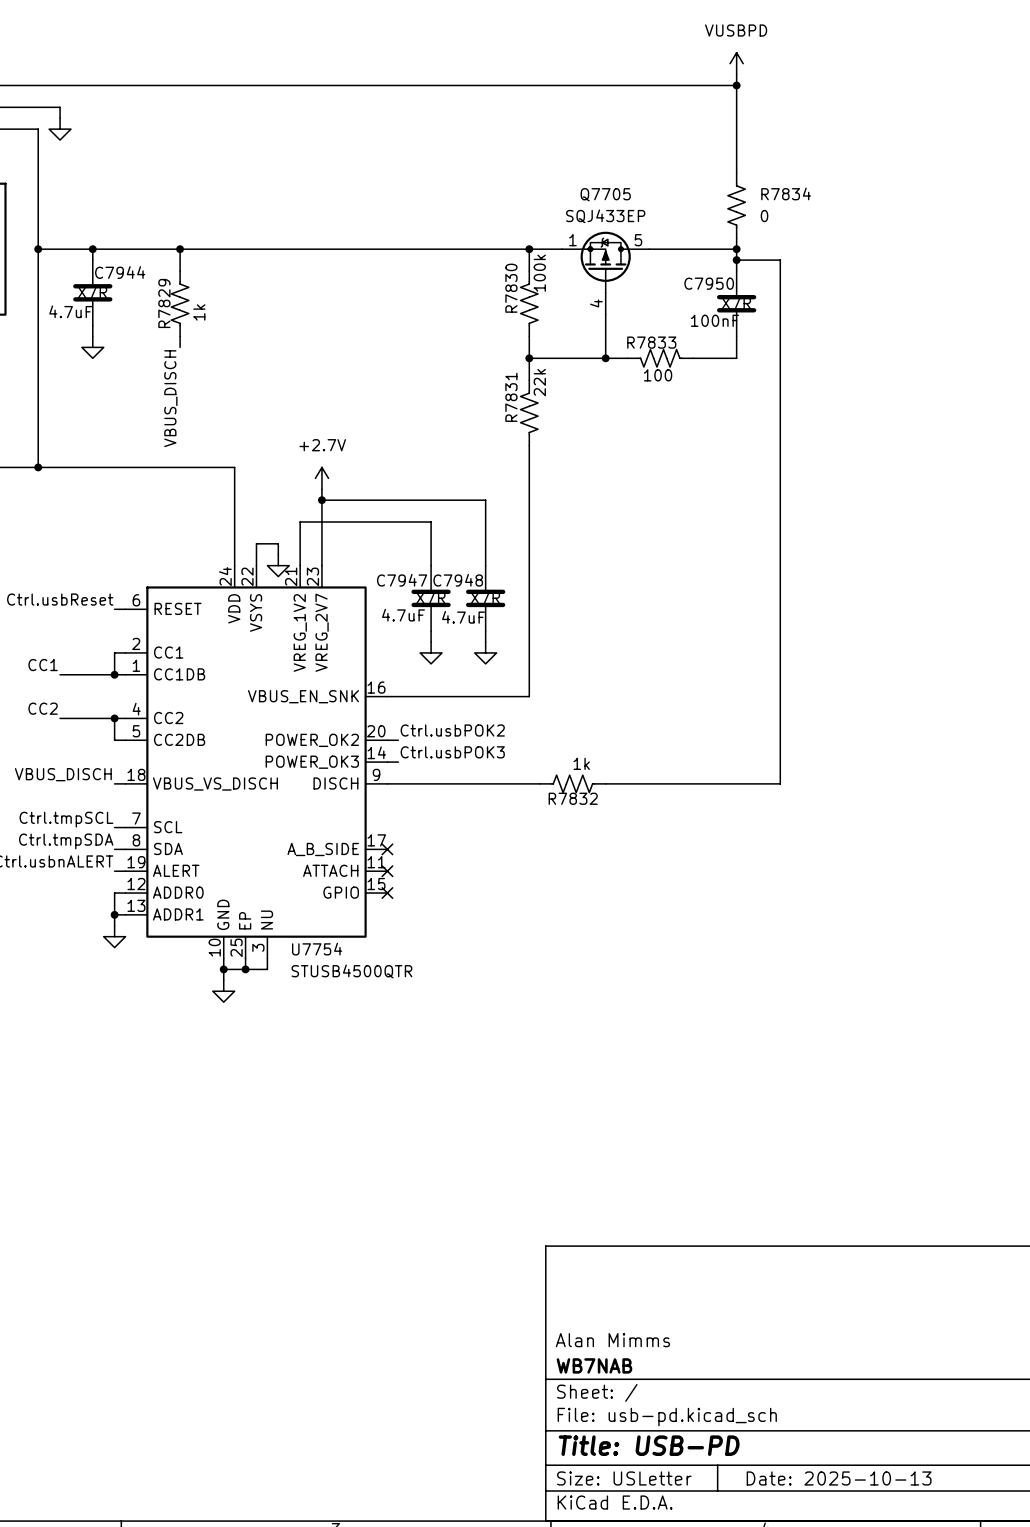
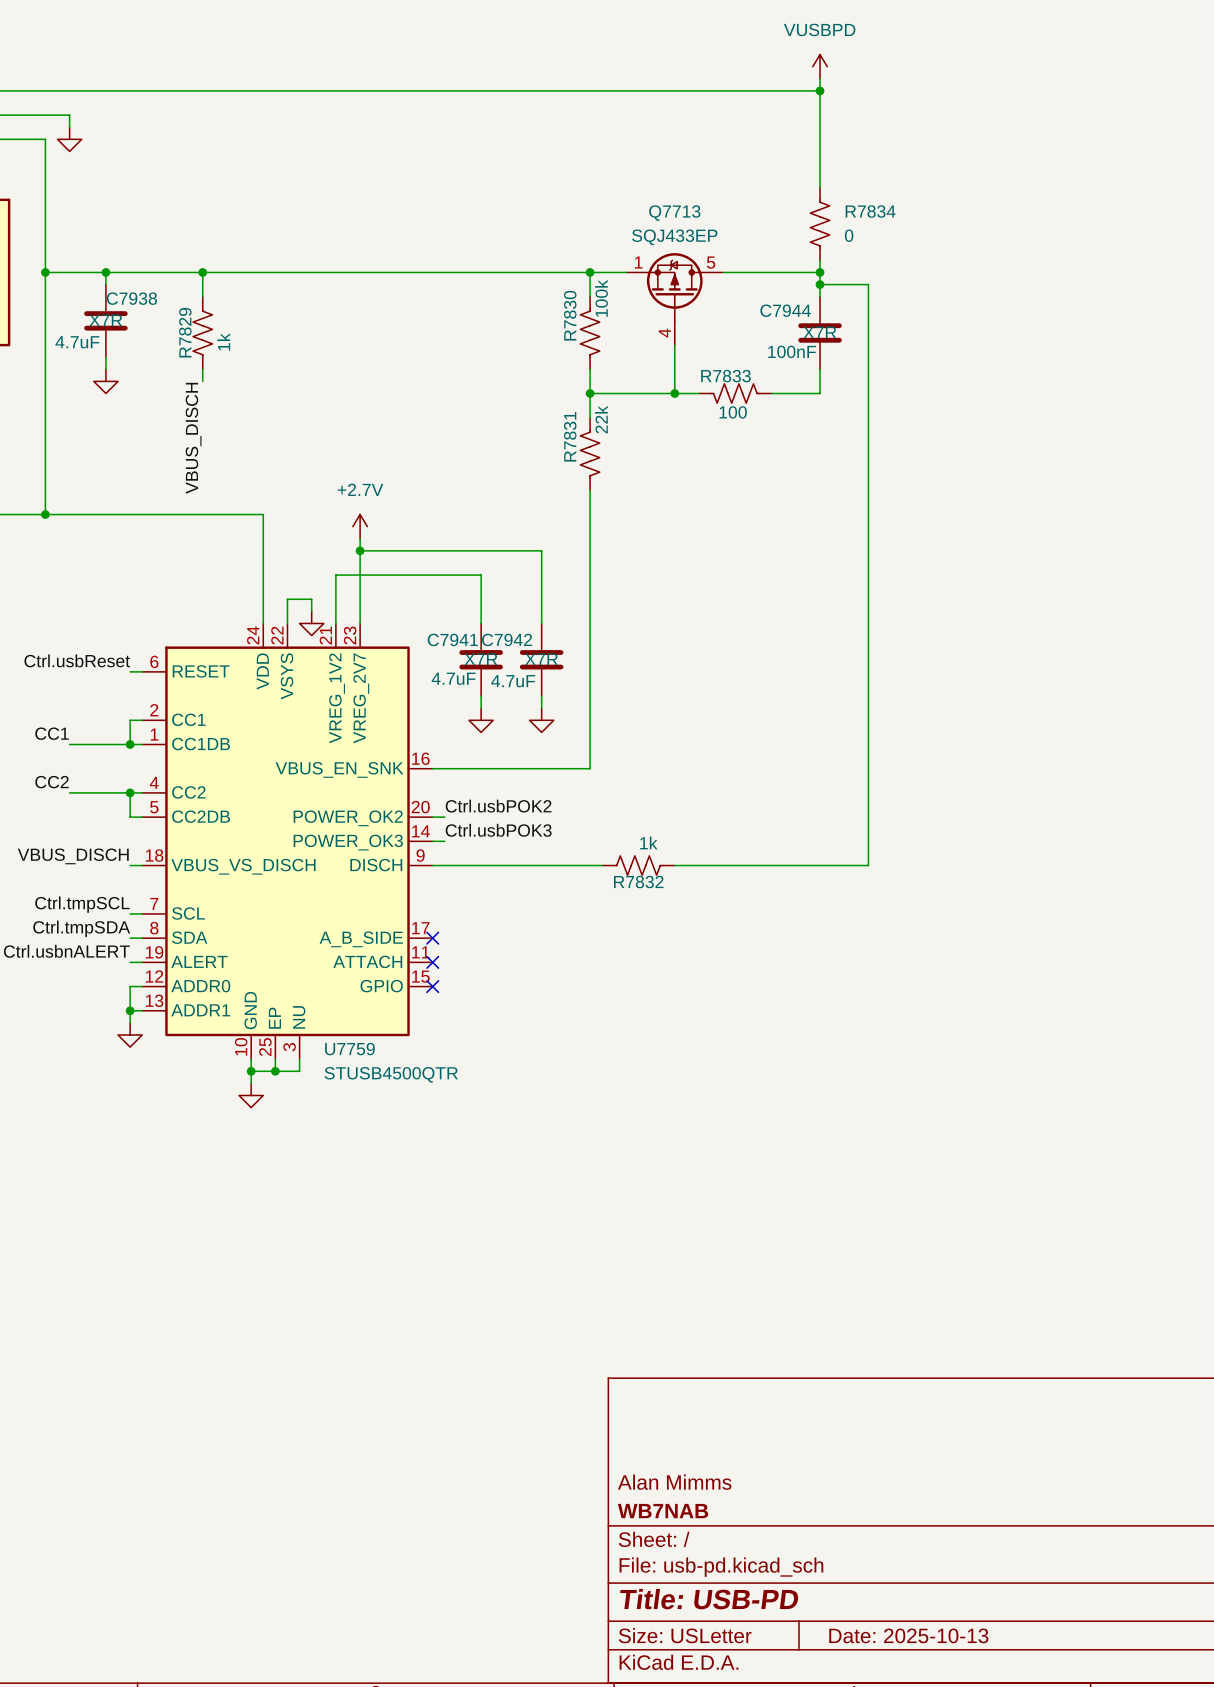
Q7705 name: Q7705 (605, 194) -> Q7713 (674, 213)
C7944 name: C7944 (120, 272) -> C7938 (131, 298)
C7950 name: C7950 (709, 283) -> C7944 (785, 310)
C7947 name: C7947 (402, 580) -> C7941 (452, 639)
C7948 name: C7948 (458, 580) -> C7942 (507, 639)
U7754 name: U7754 (317, 949) -> U7759 (349, 1049)

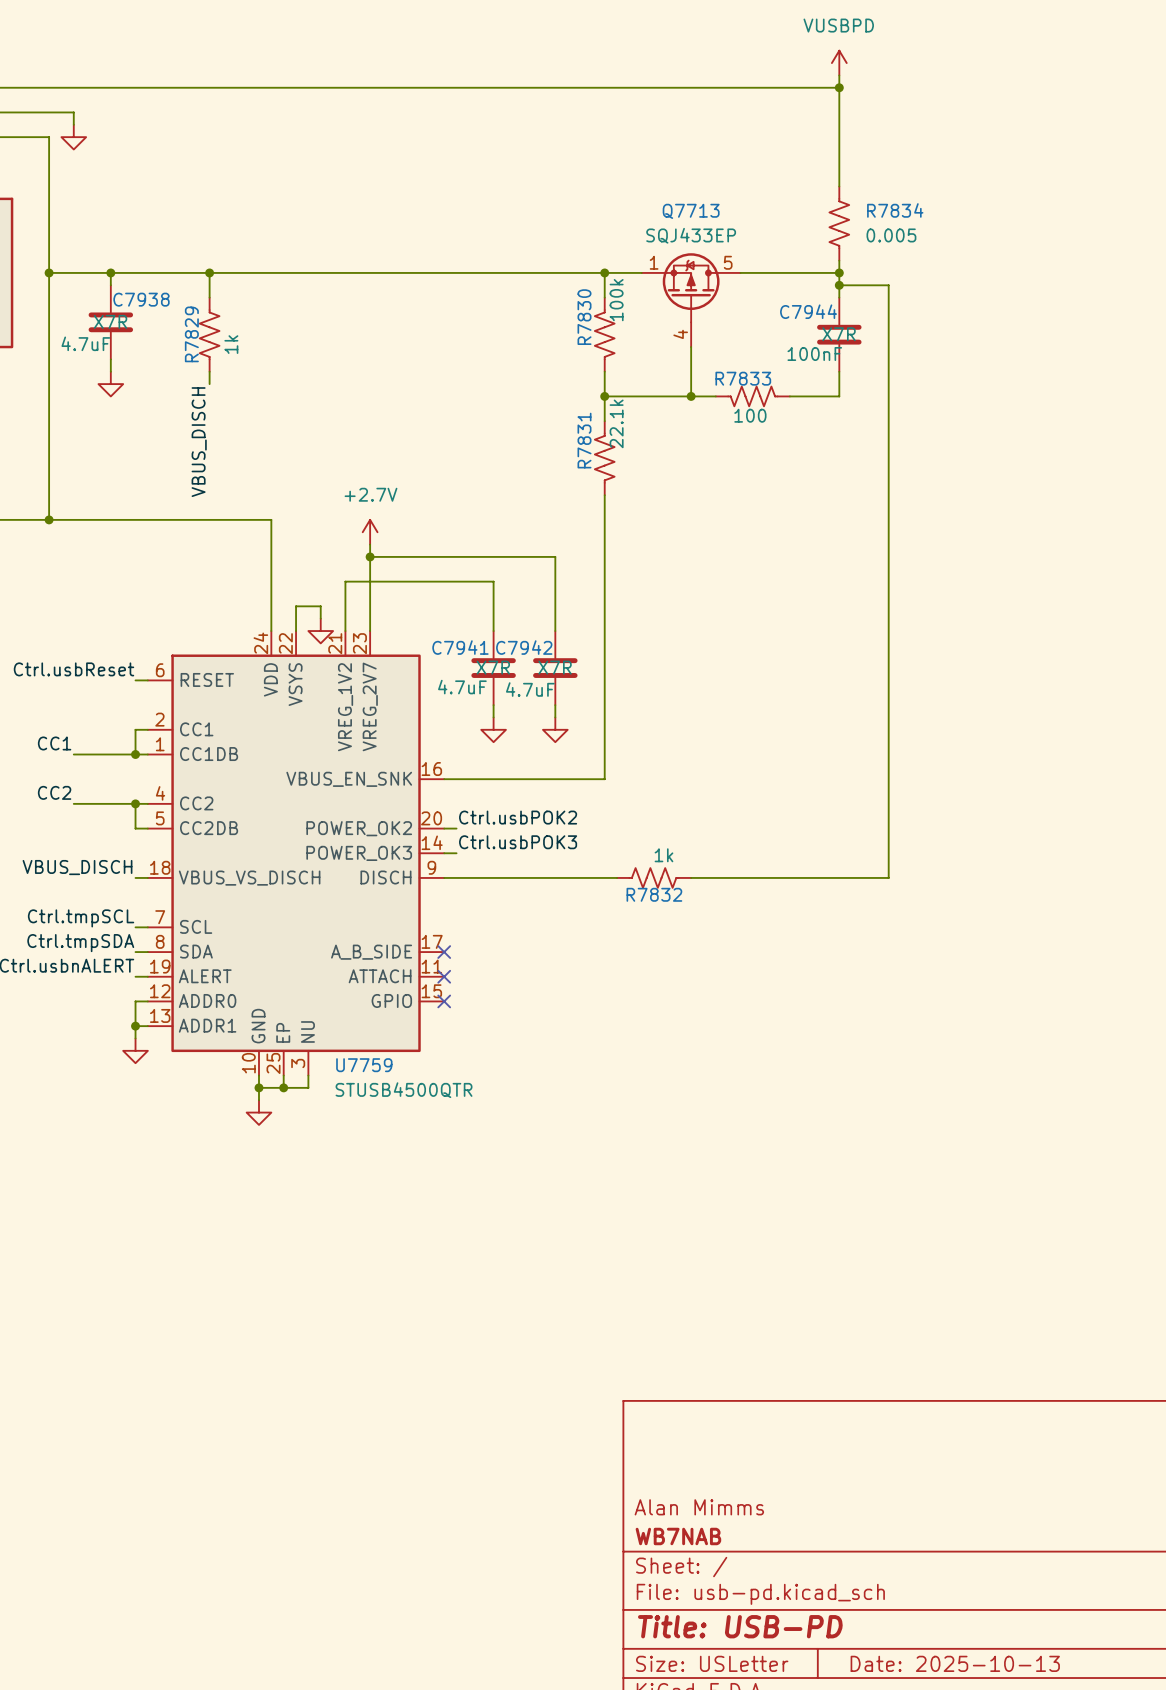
R7834 value: 0 (849, 235) -> 0.005 (891, 235)
R7831 value: 22k (601, 419) -> 22.1k (616, 423)

